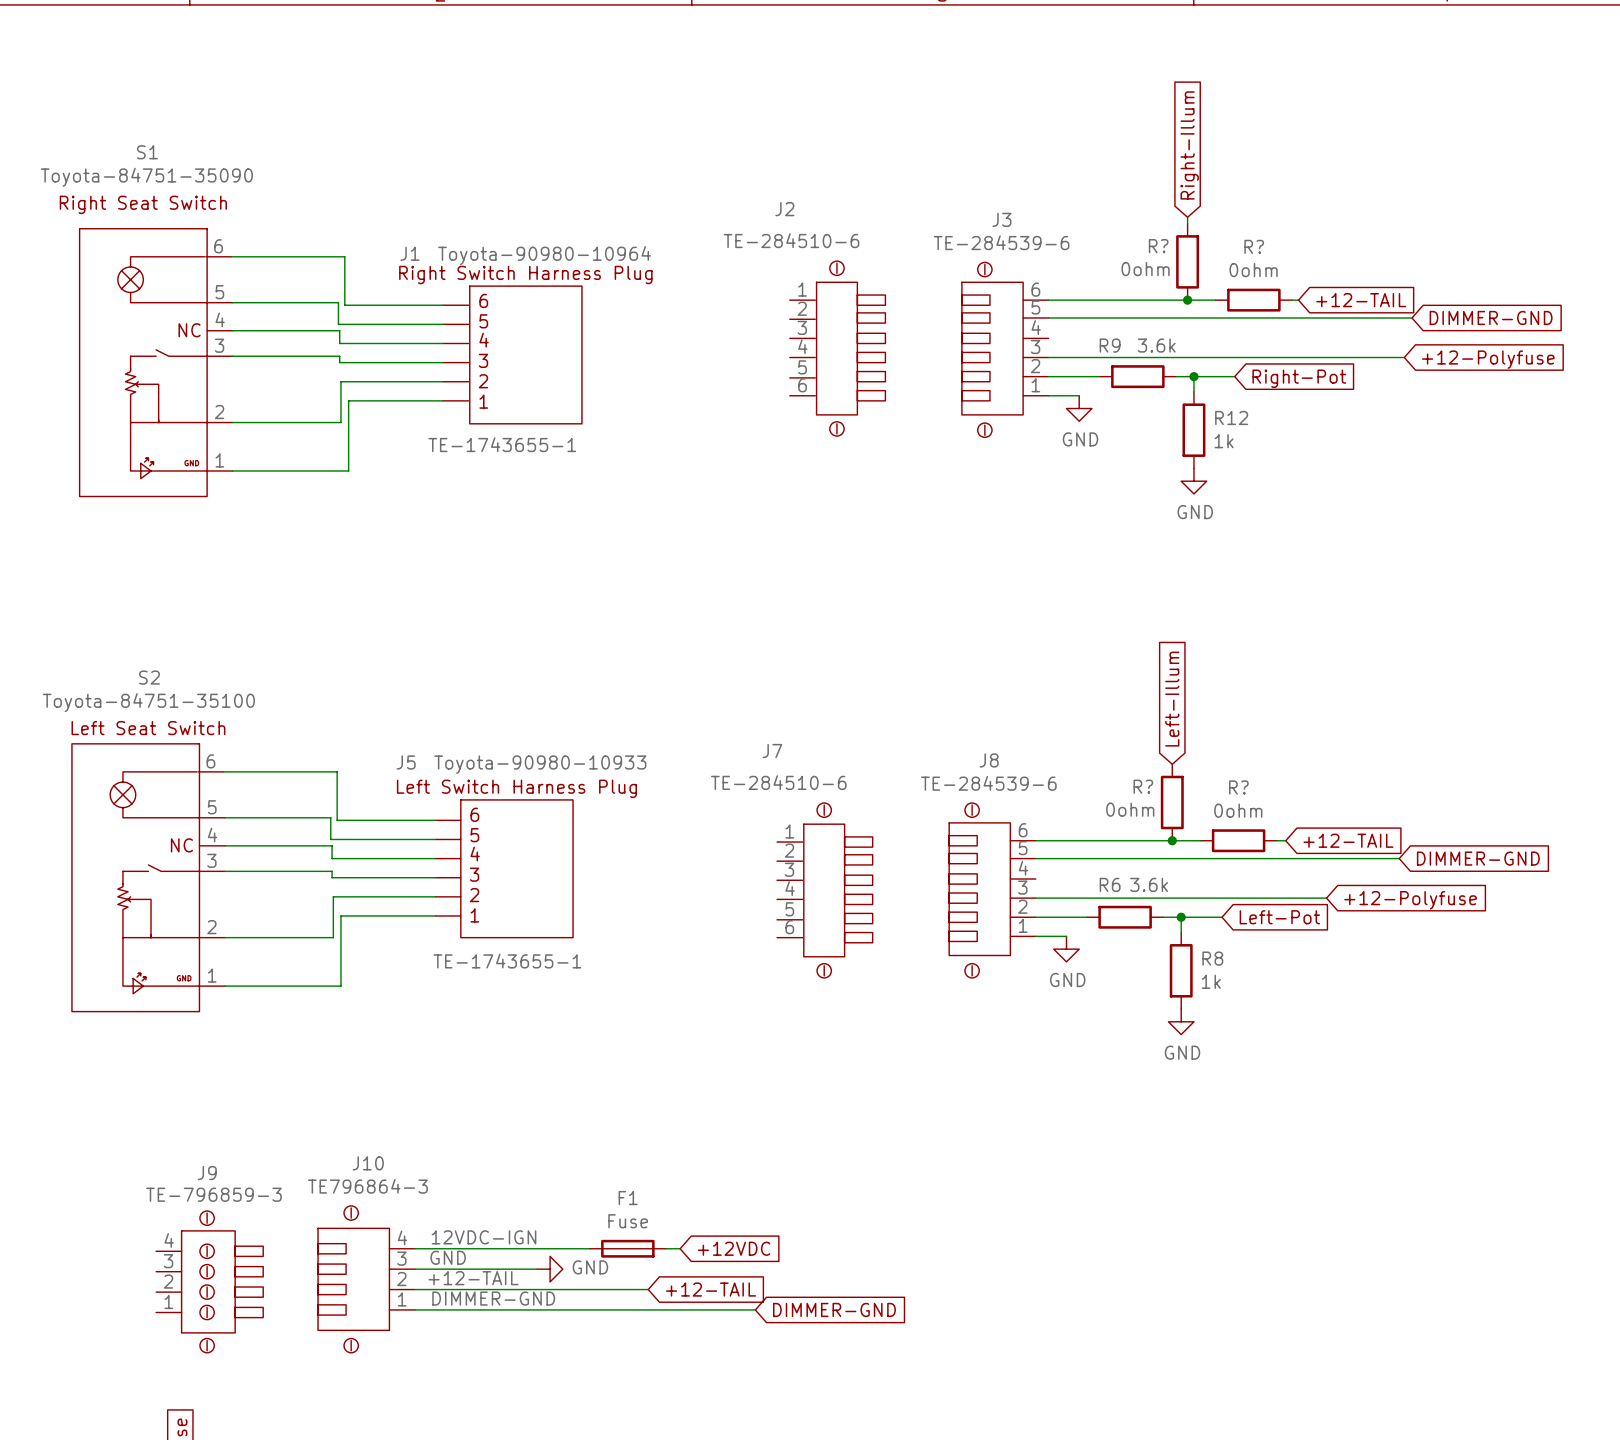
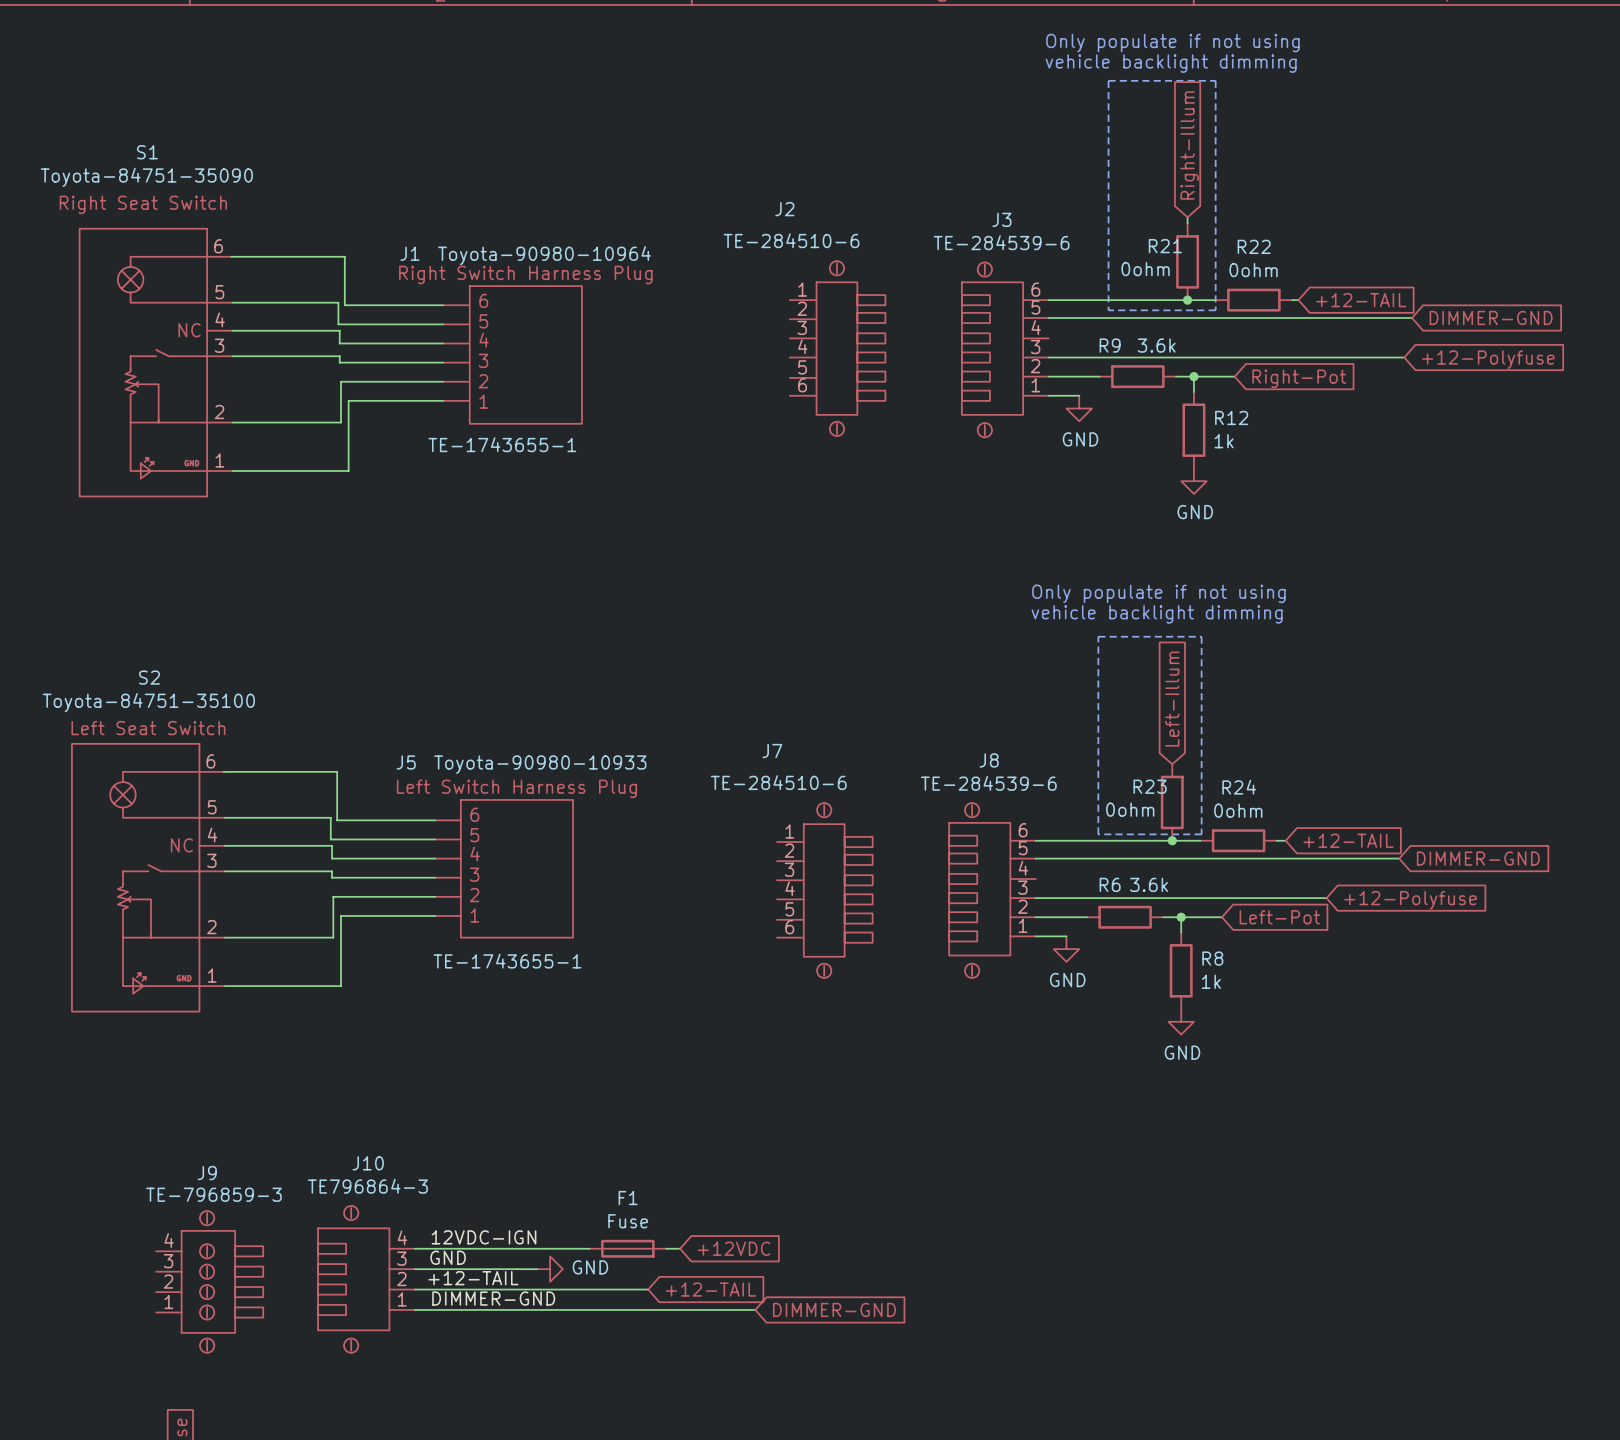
text: none -> Only populate if not using (1172, 43)
text: none -> vehicle backlight dimming (1171, 63)
line: none -> (1108, 80) (1215, 80) (1215, 310) (1108, 310) (1108, 80)
R? name: R? (1158, 246) -> R21 (1165, 246)
R? name: R? (1254, 246) -> R22 (1254, 246)
text: none -> Only populate if not using (1158, 593)
text: none -> vehicle backlight dimming (1157, 614)
line: none -> (1098, 636) (1098, 834) (1201, 834) (1201, 636) (1098, 636)
R? name: R? (1143, 786) -> R23 (1150, 786)
R? name: R? (1238, 787) -> R24 (1239, 787)

